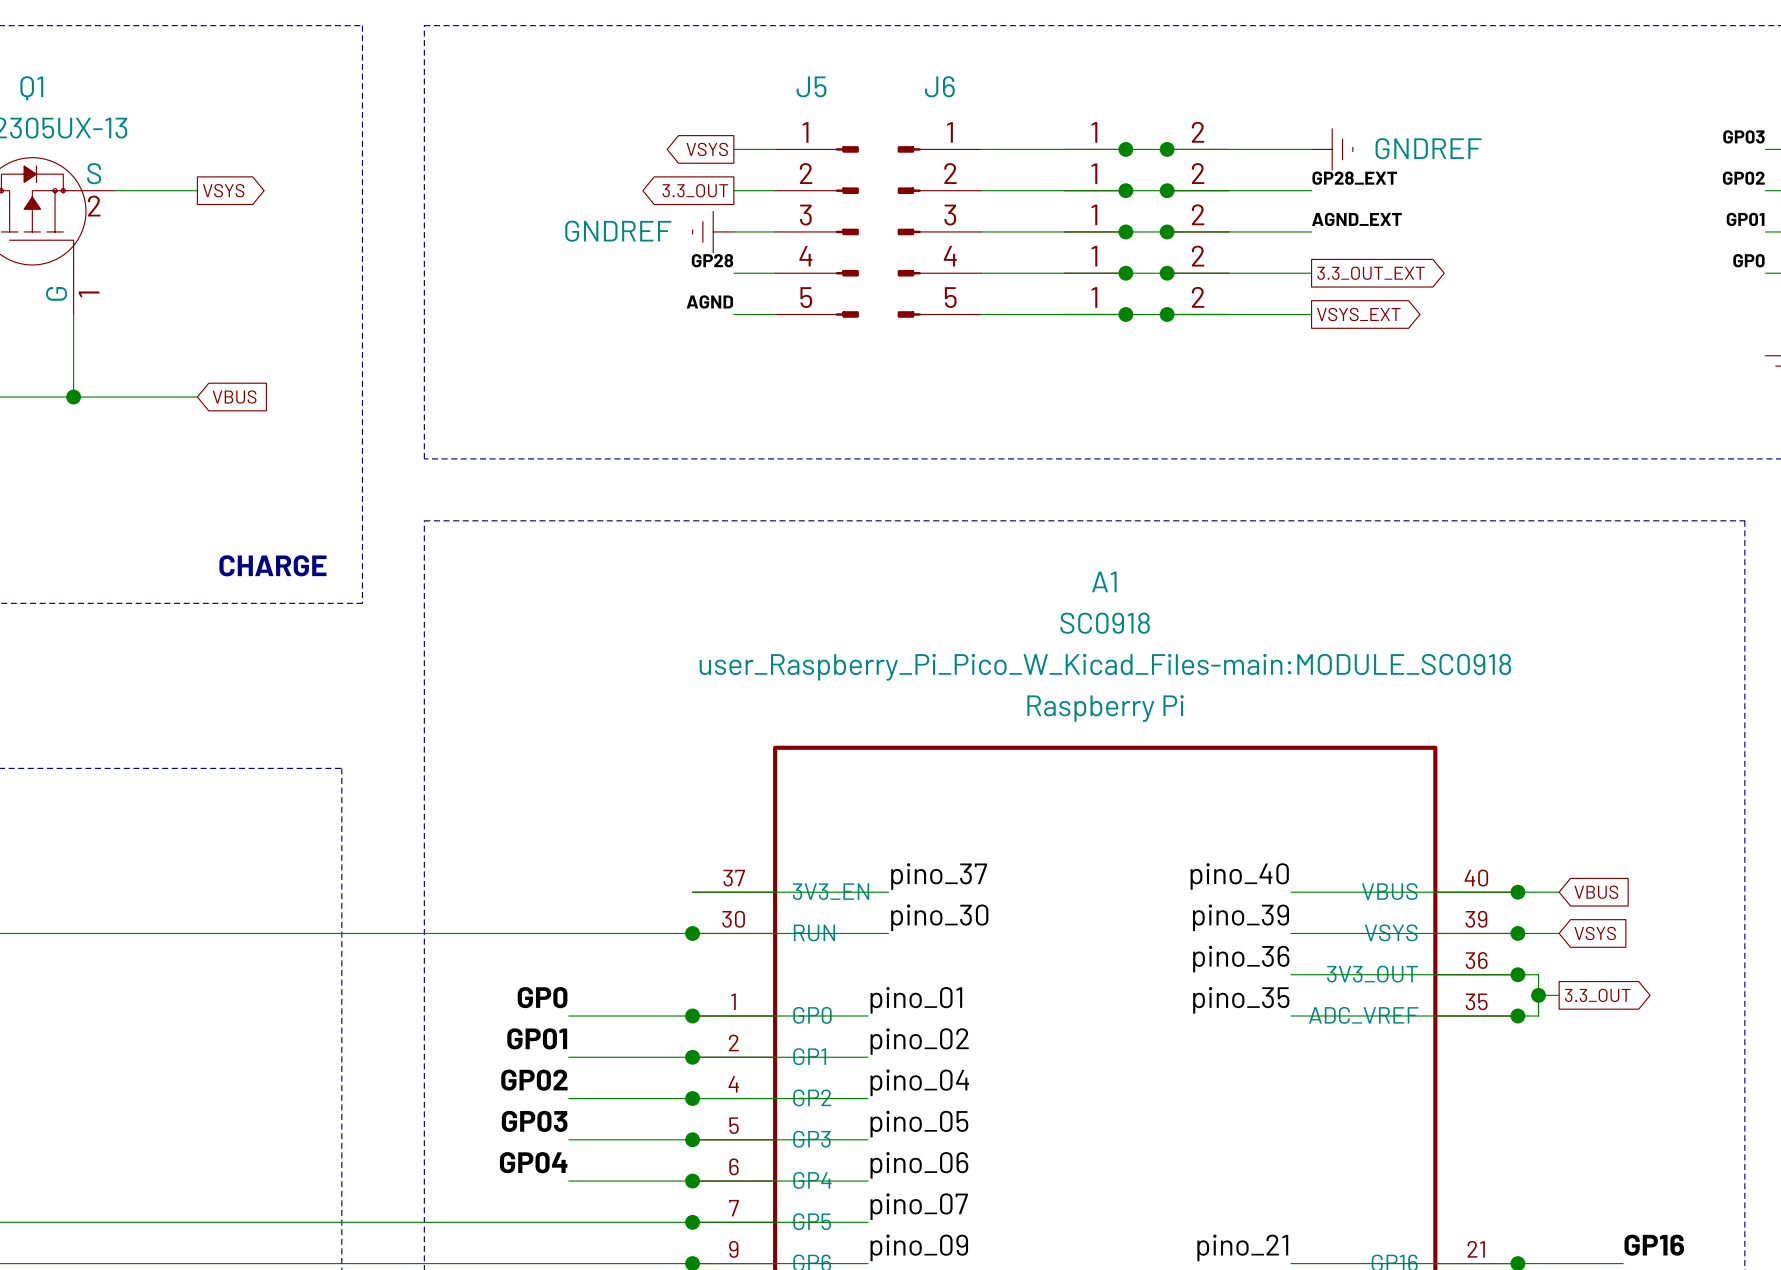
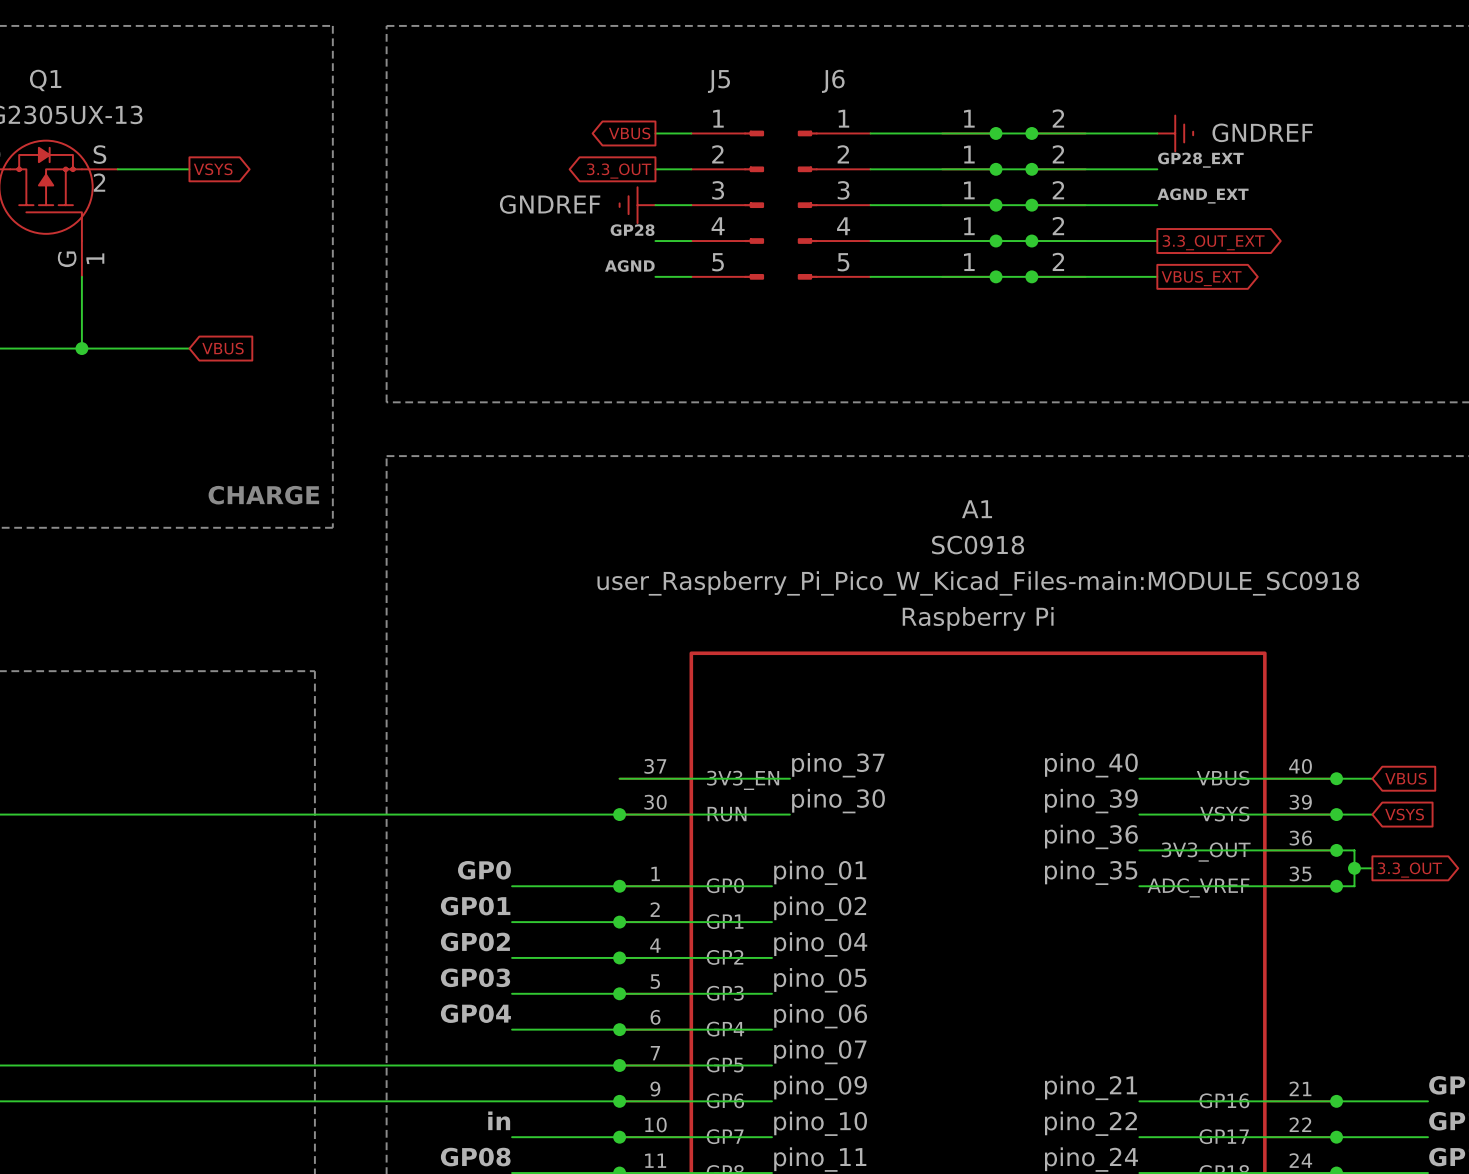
global label: VSYS (707, 149) -> VBUS (629, 133)
global label: VSYS_EXT (1358, 314) -> VBUS_EXT (1201, 278)

